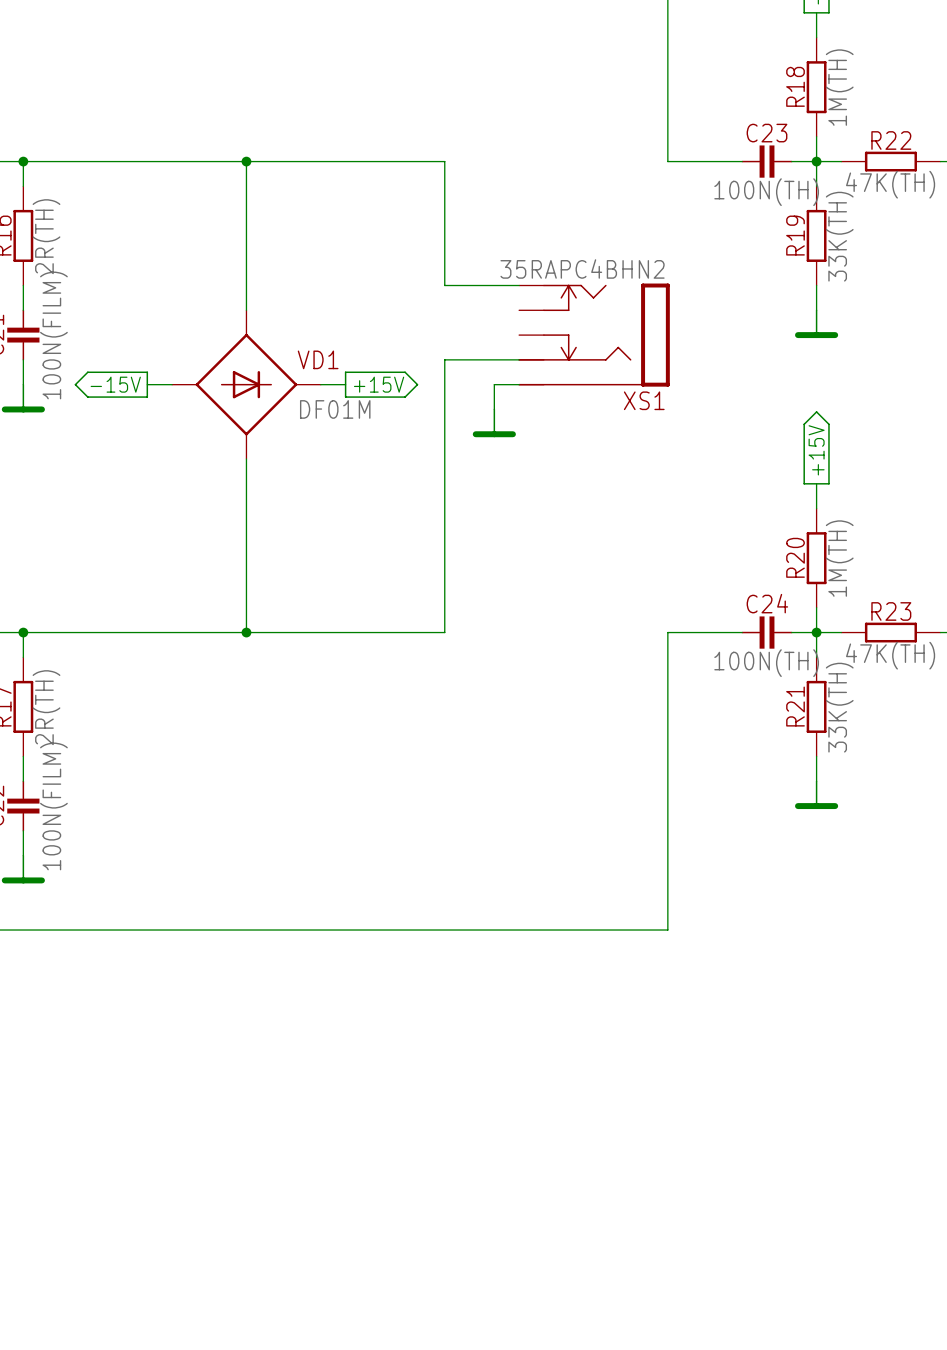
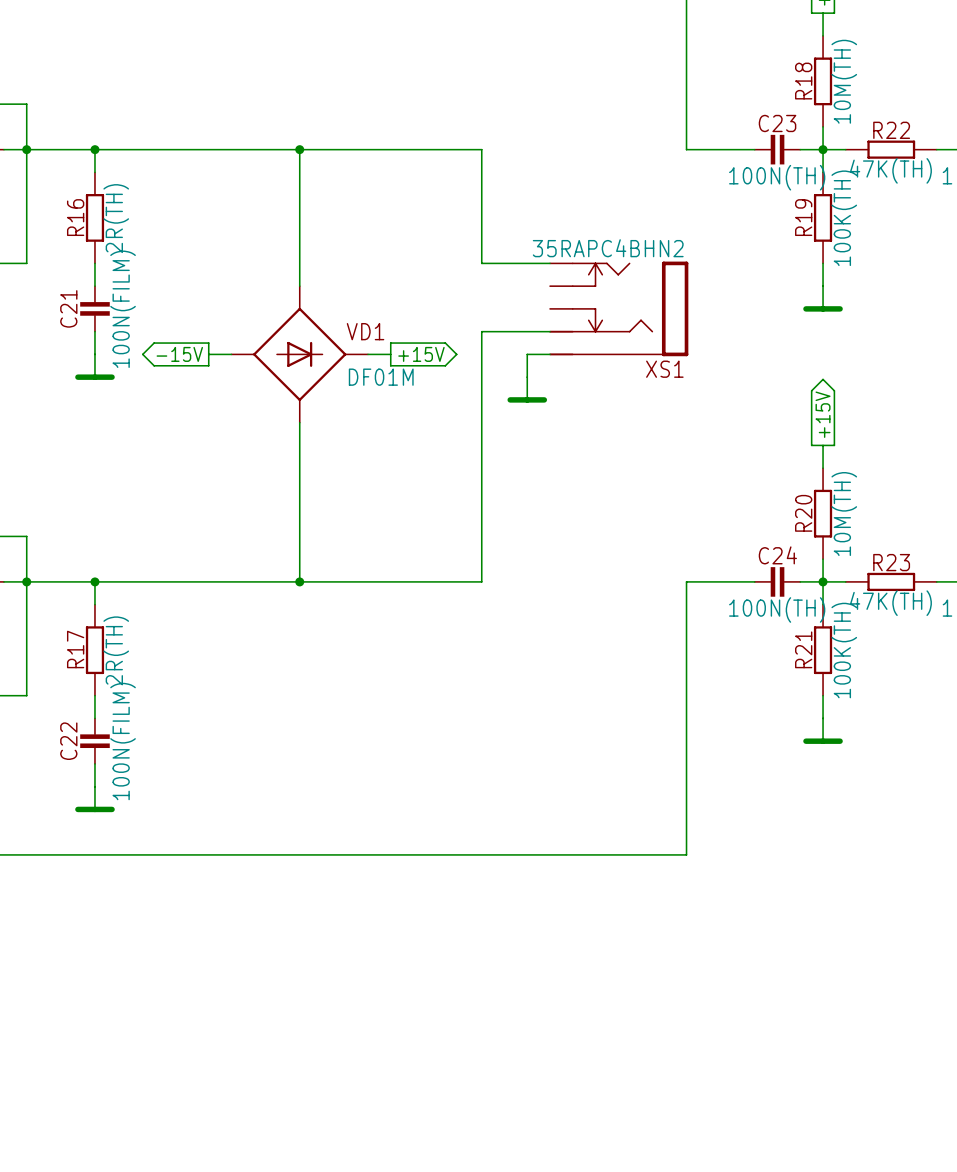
R18 value: 1M(TH) (839, 87) -> 10M(TH) (844, 81)
R19 value: 33K(TH) (839, 236) -> 100K(TH) (844, 218)
R20 value: 1M(TH) (839, 558) -> 10M(TH) (844, 514)
R21 value: 33K(TH) (839, 707) -> 100K(TH) (844, 650)

